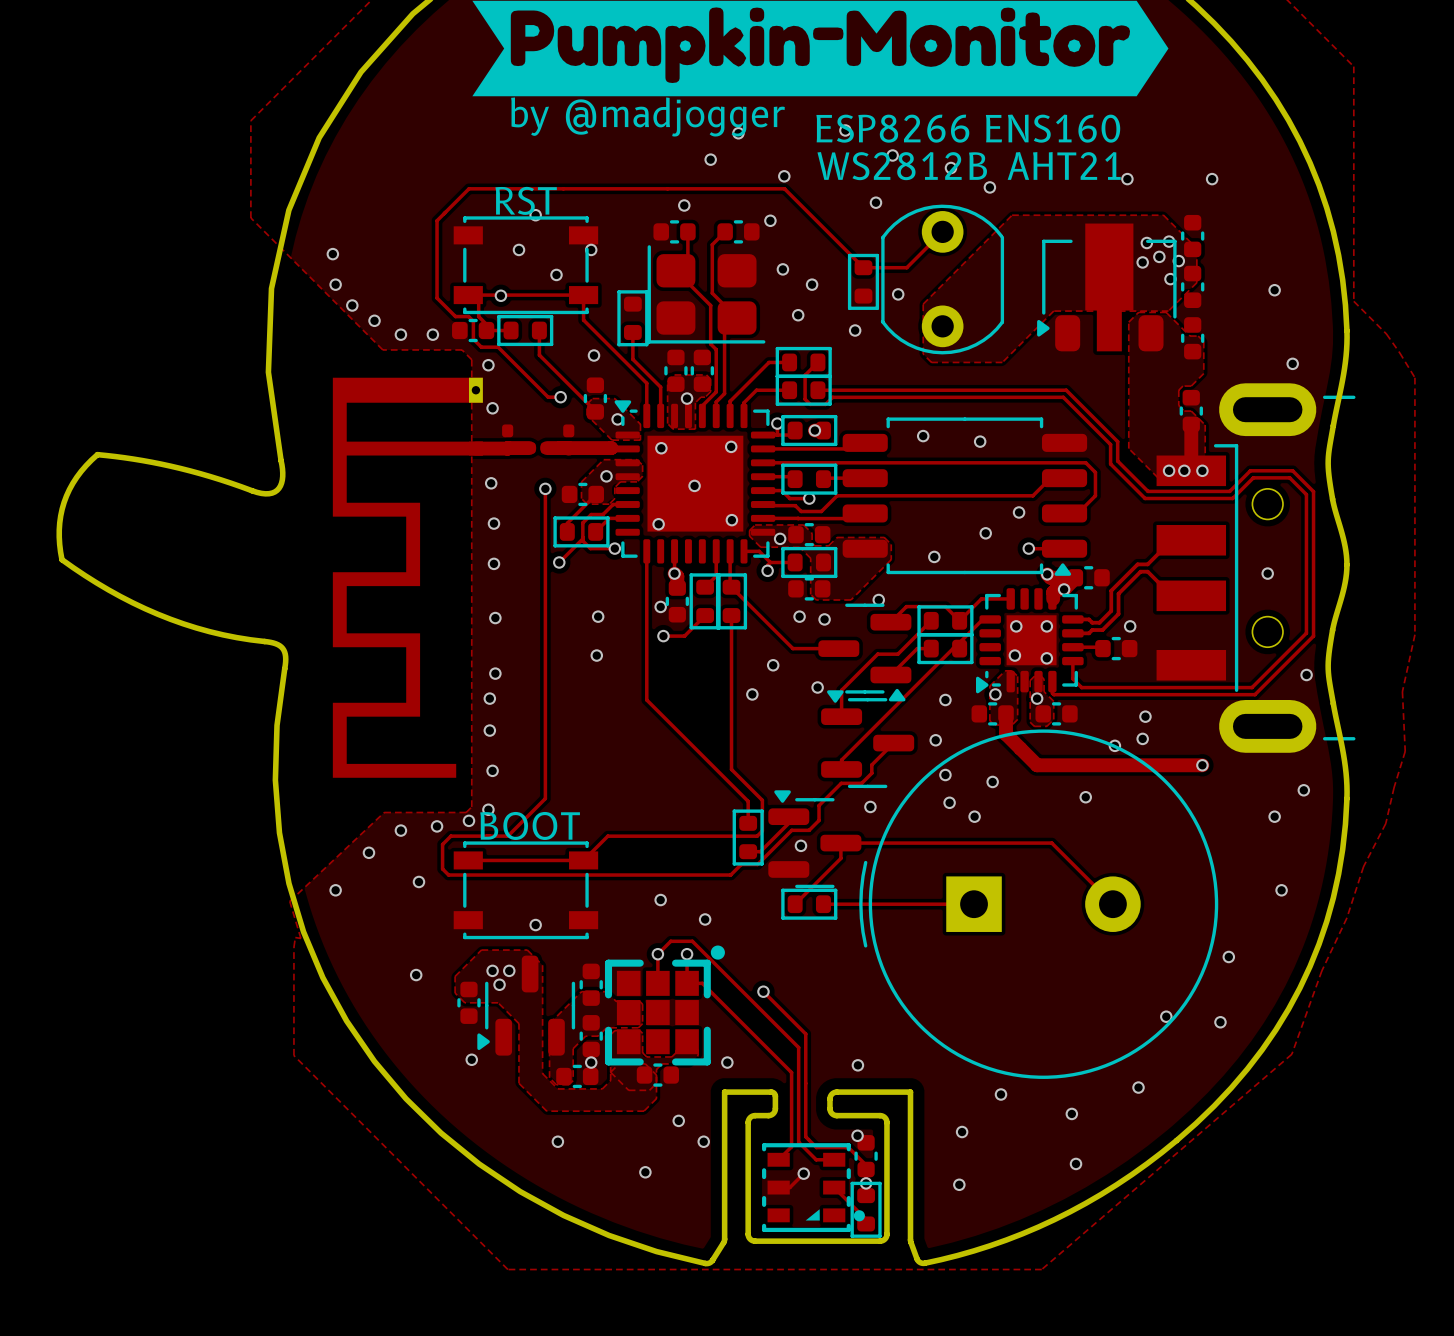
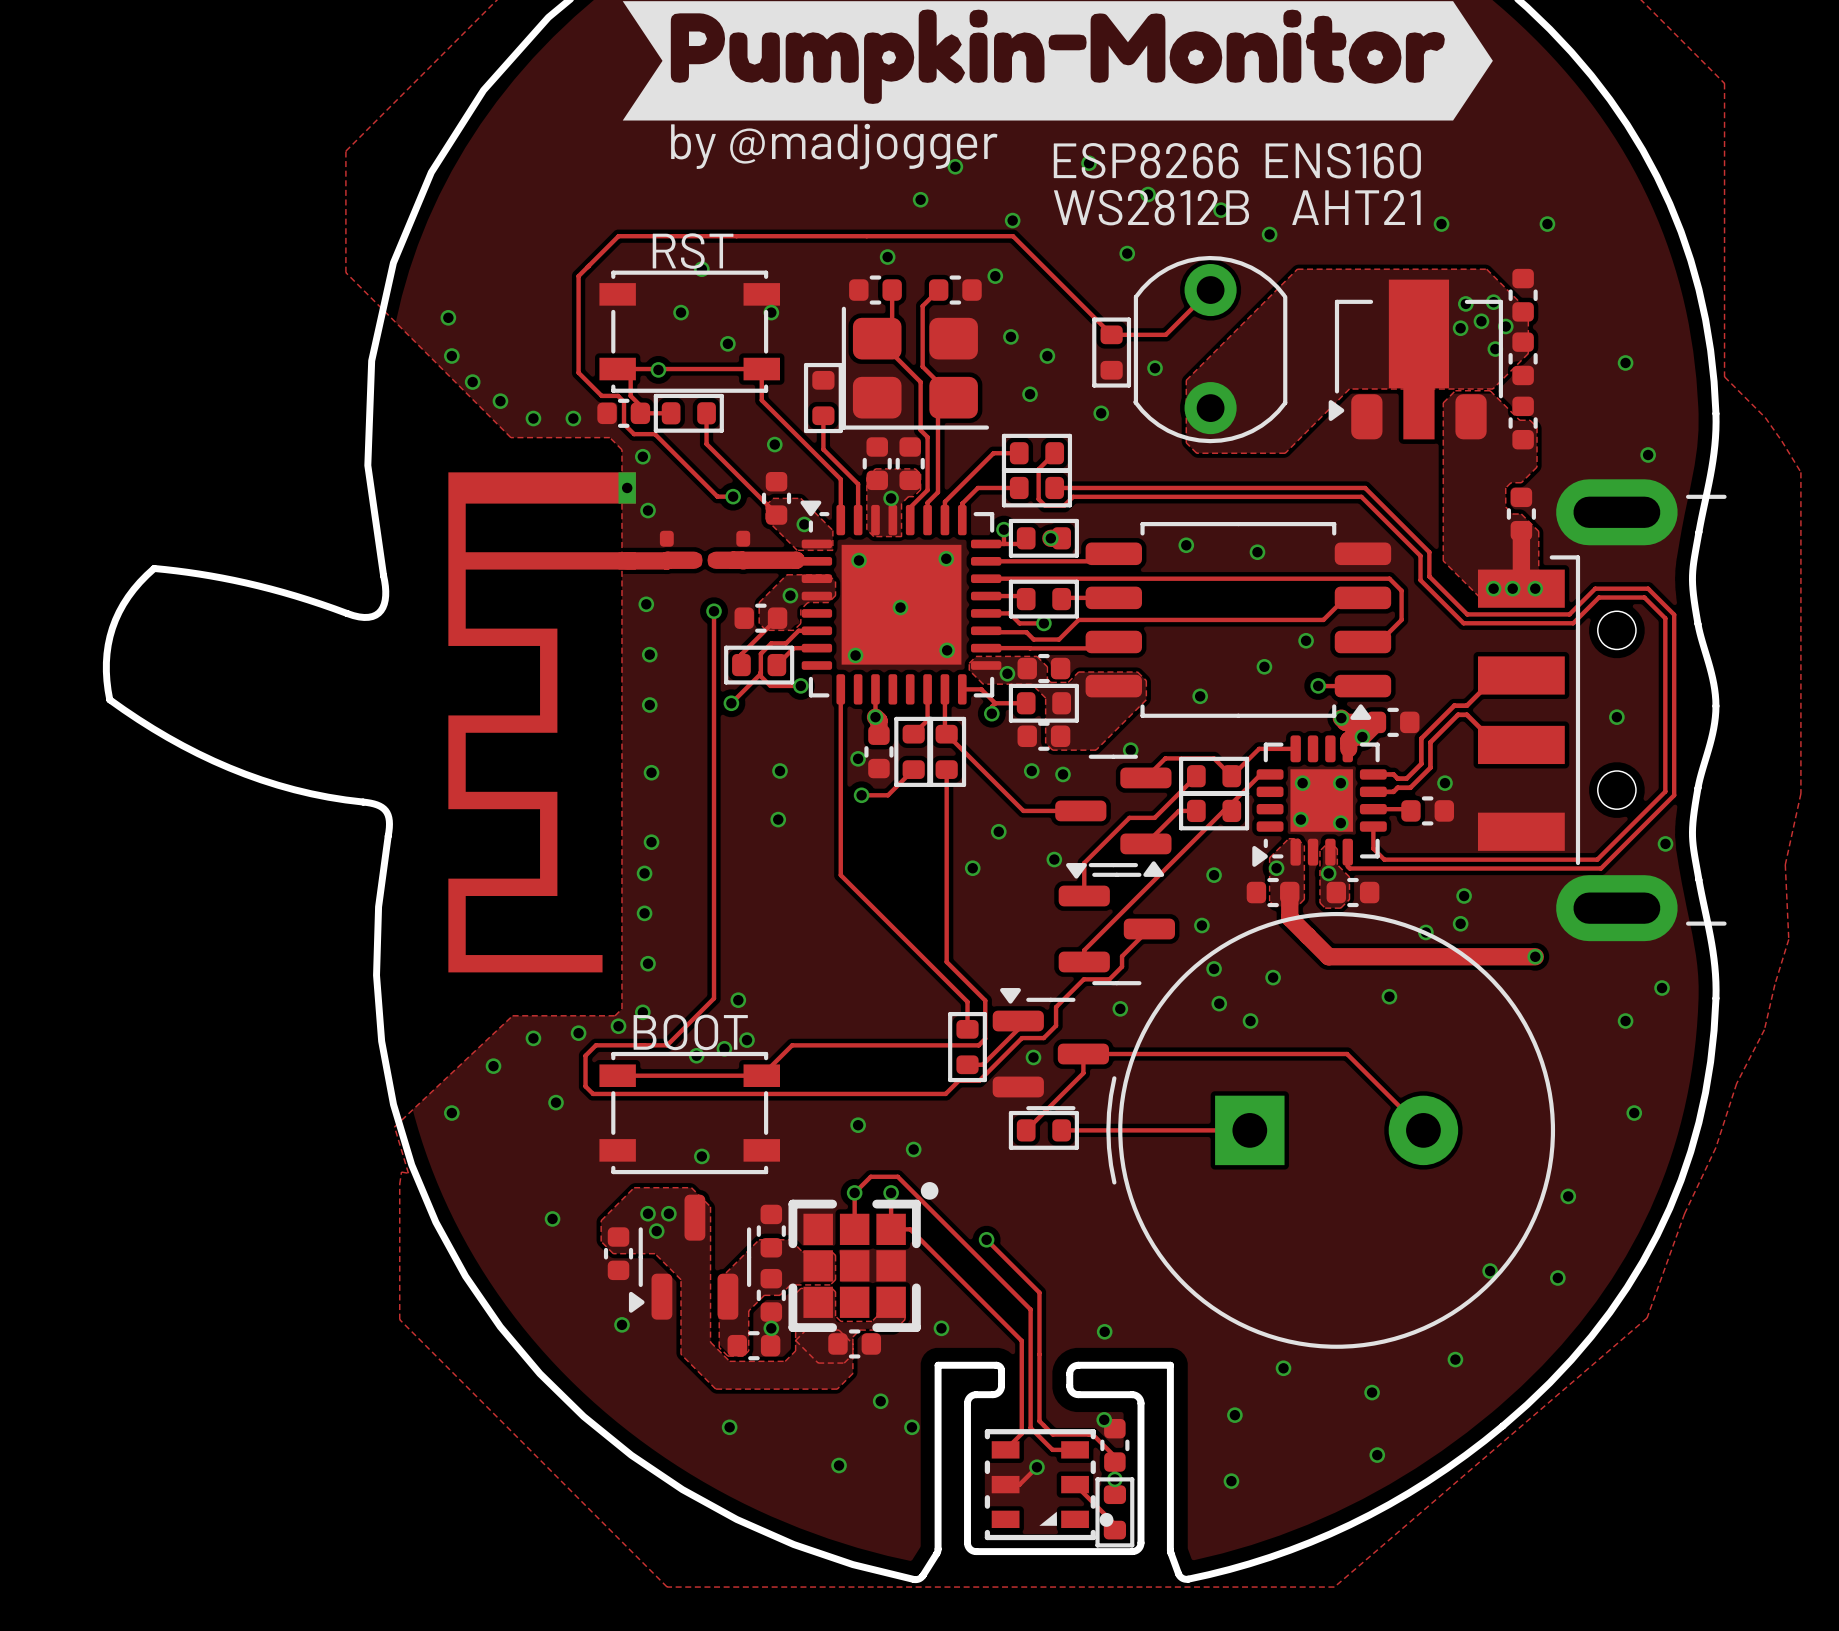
via: none -> (738, 1000)
via: none -> (747, 1040)
via: none -> (724, 1048)
via: none -> (696, 1055)

